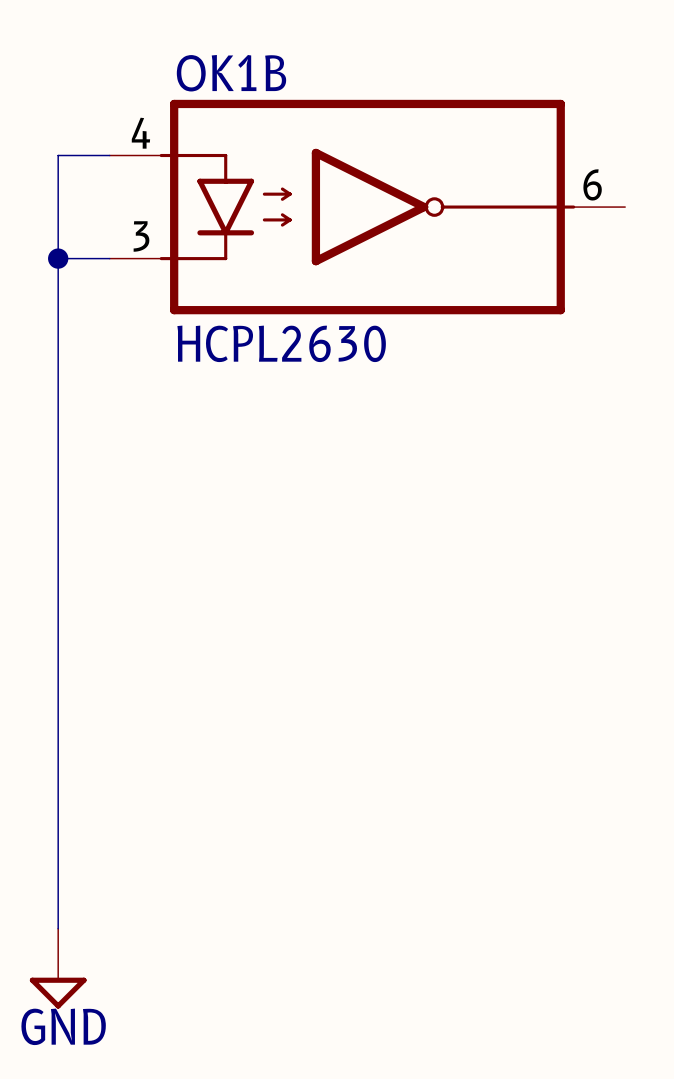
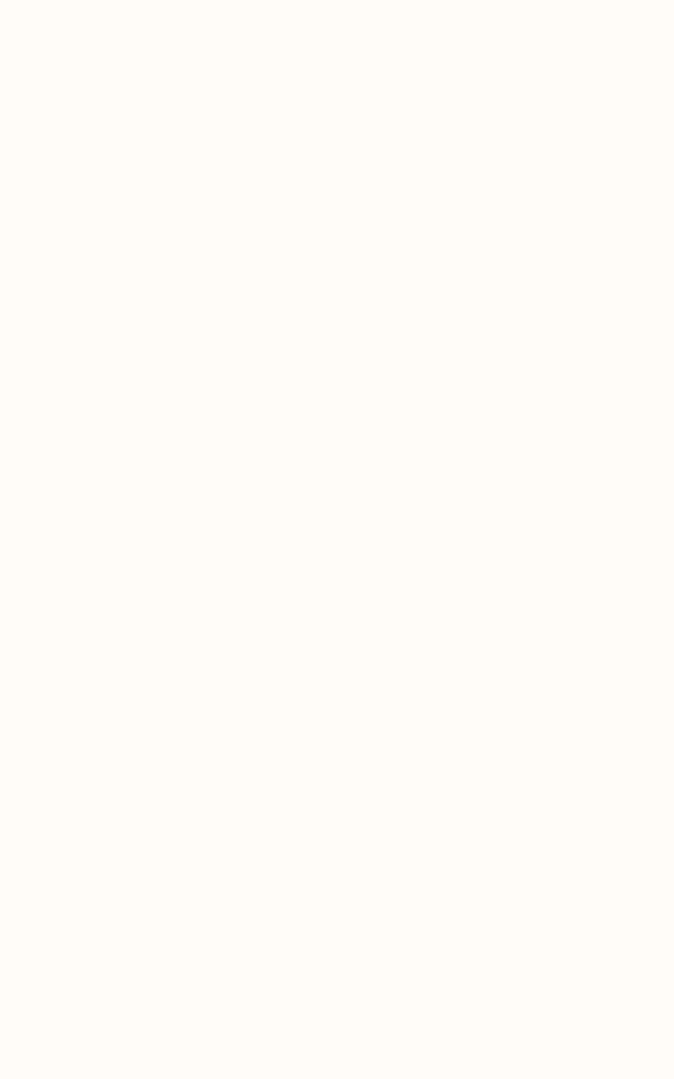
wire: (109, 155) (58, 155) (58, 928) -> none
OK1B: HCPL2630 (367, 207) -> none
wire: (58, 258) (109, 258) -> none
junction: (58, 258) -> none
power symbol: GND (58, 968) -> none

